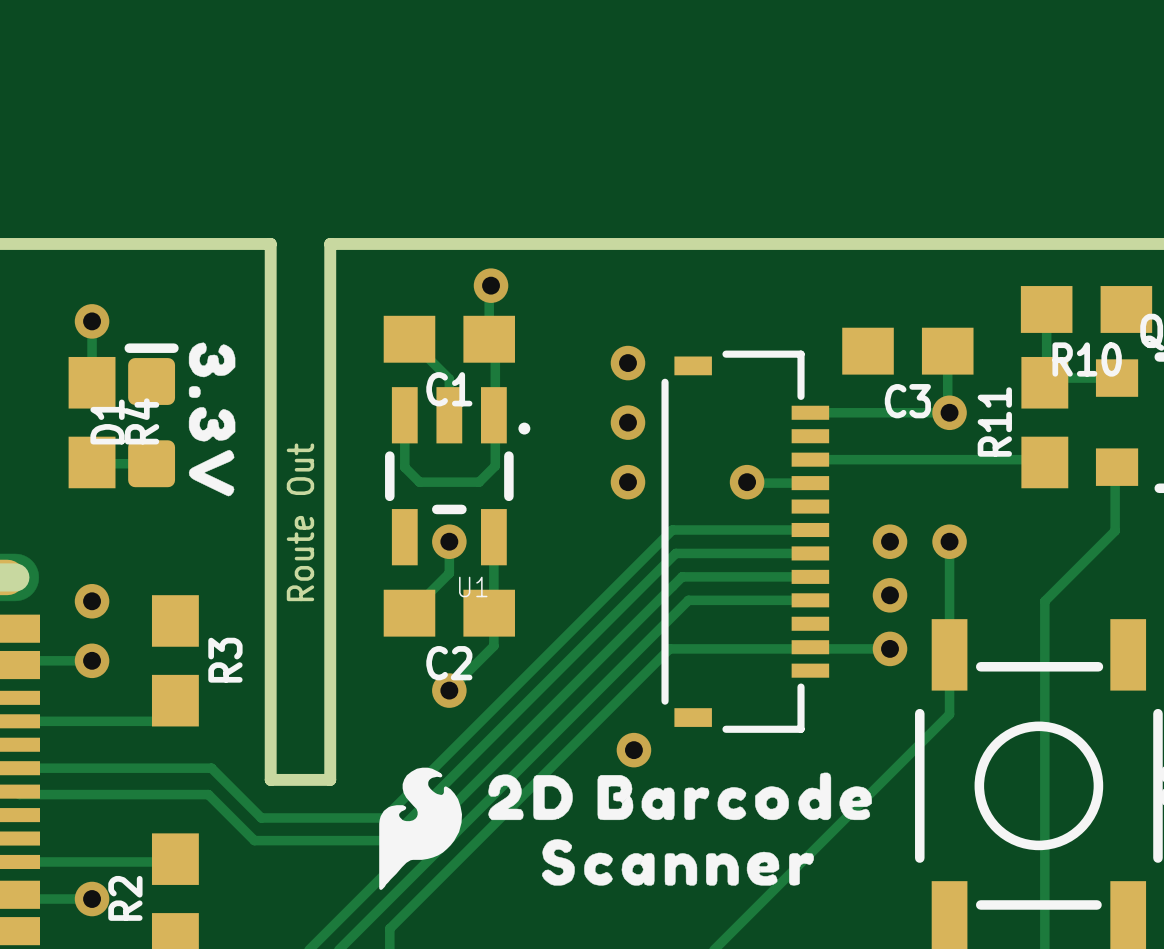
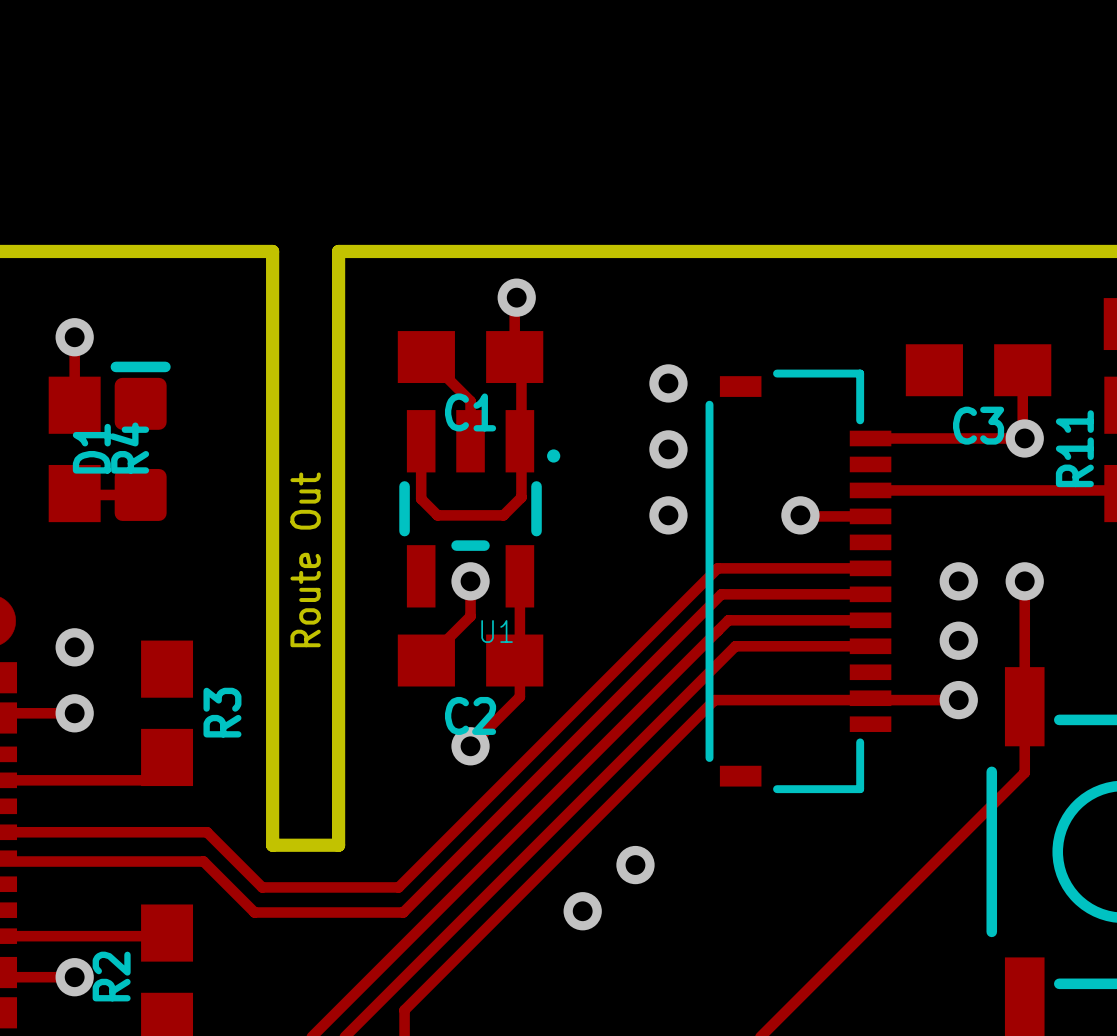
drawing: [188, 342, 236, 497] -> none
via position: (633, 750) -> (635, 865)
drawing: [379, 767, 872, 890] -> none
via: none -> (582, 911)

